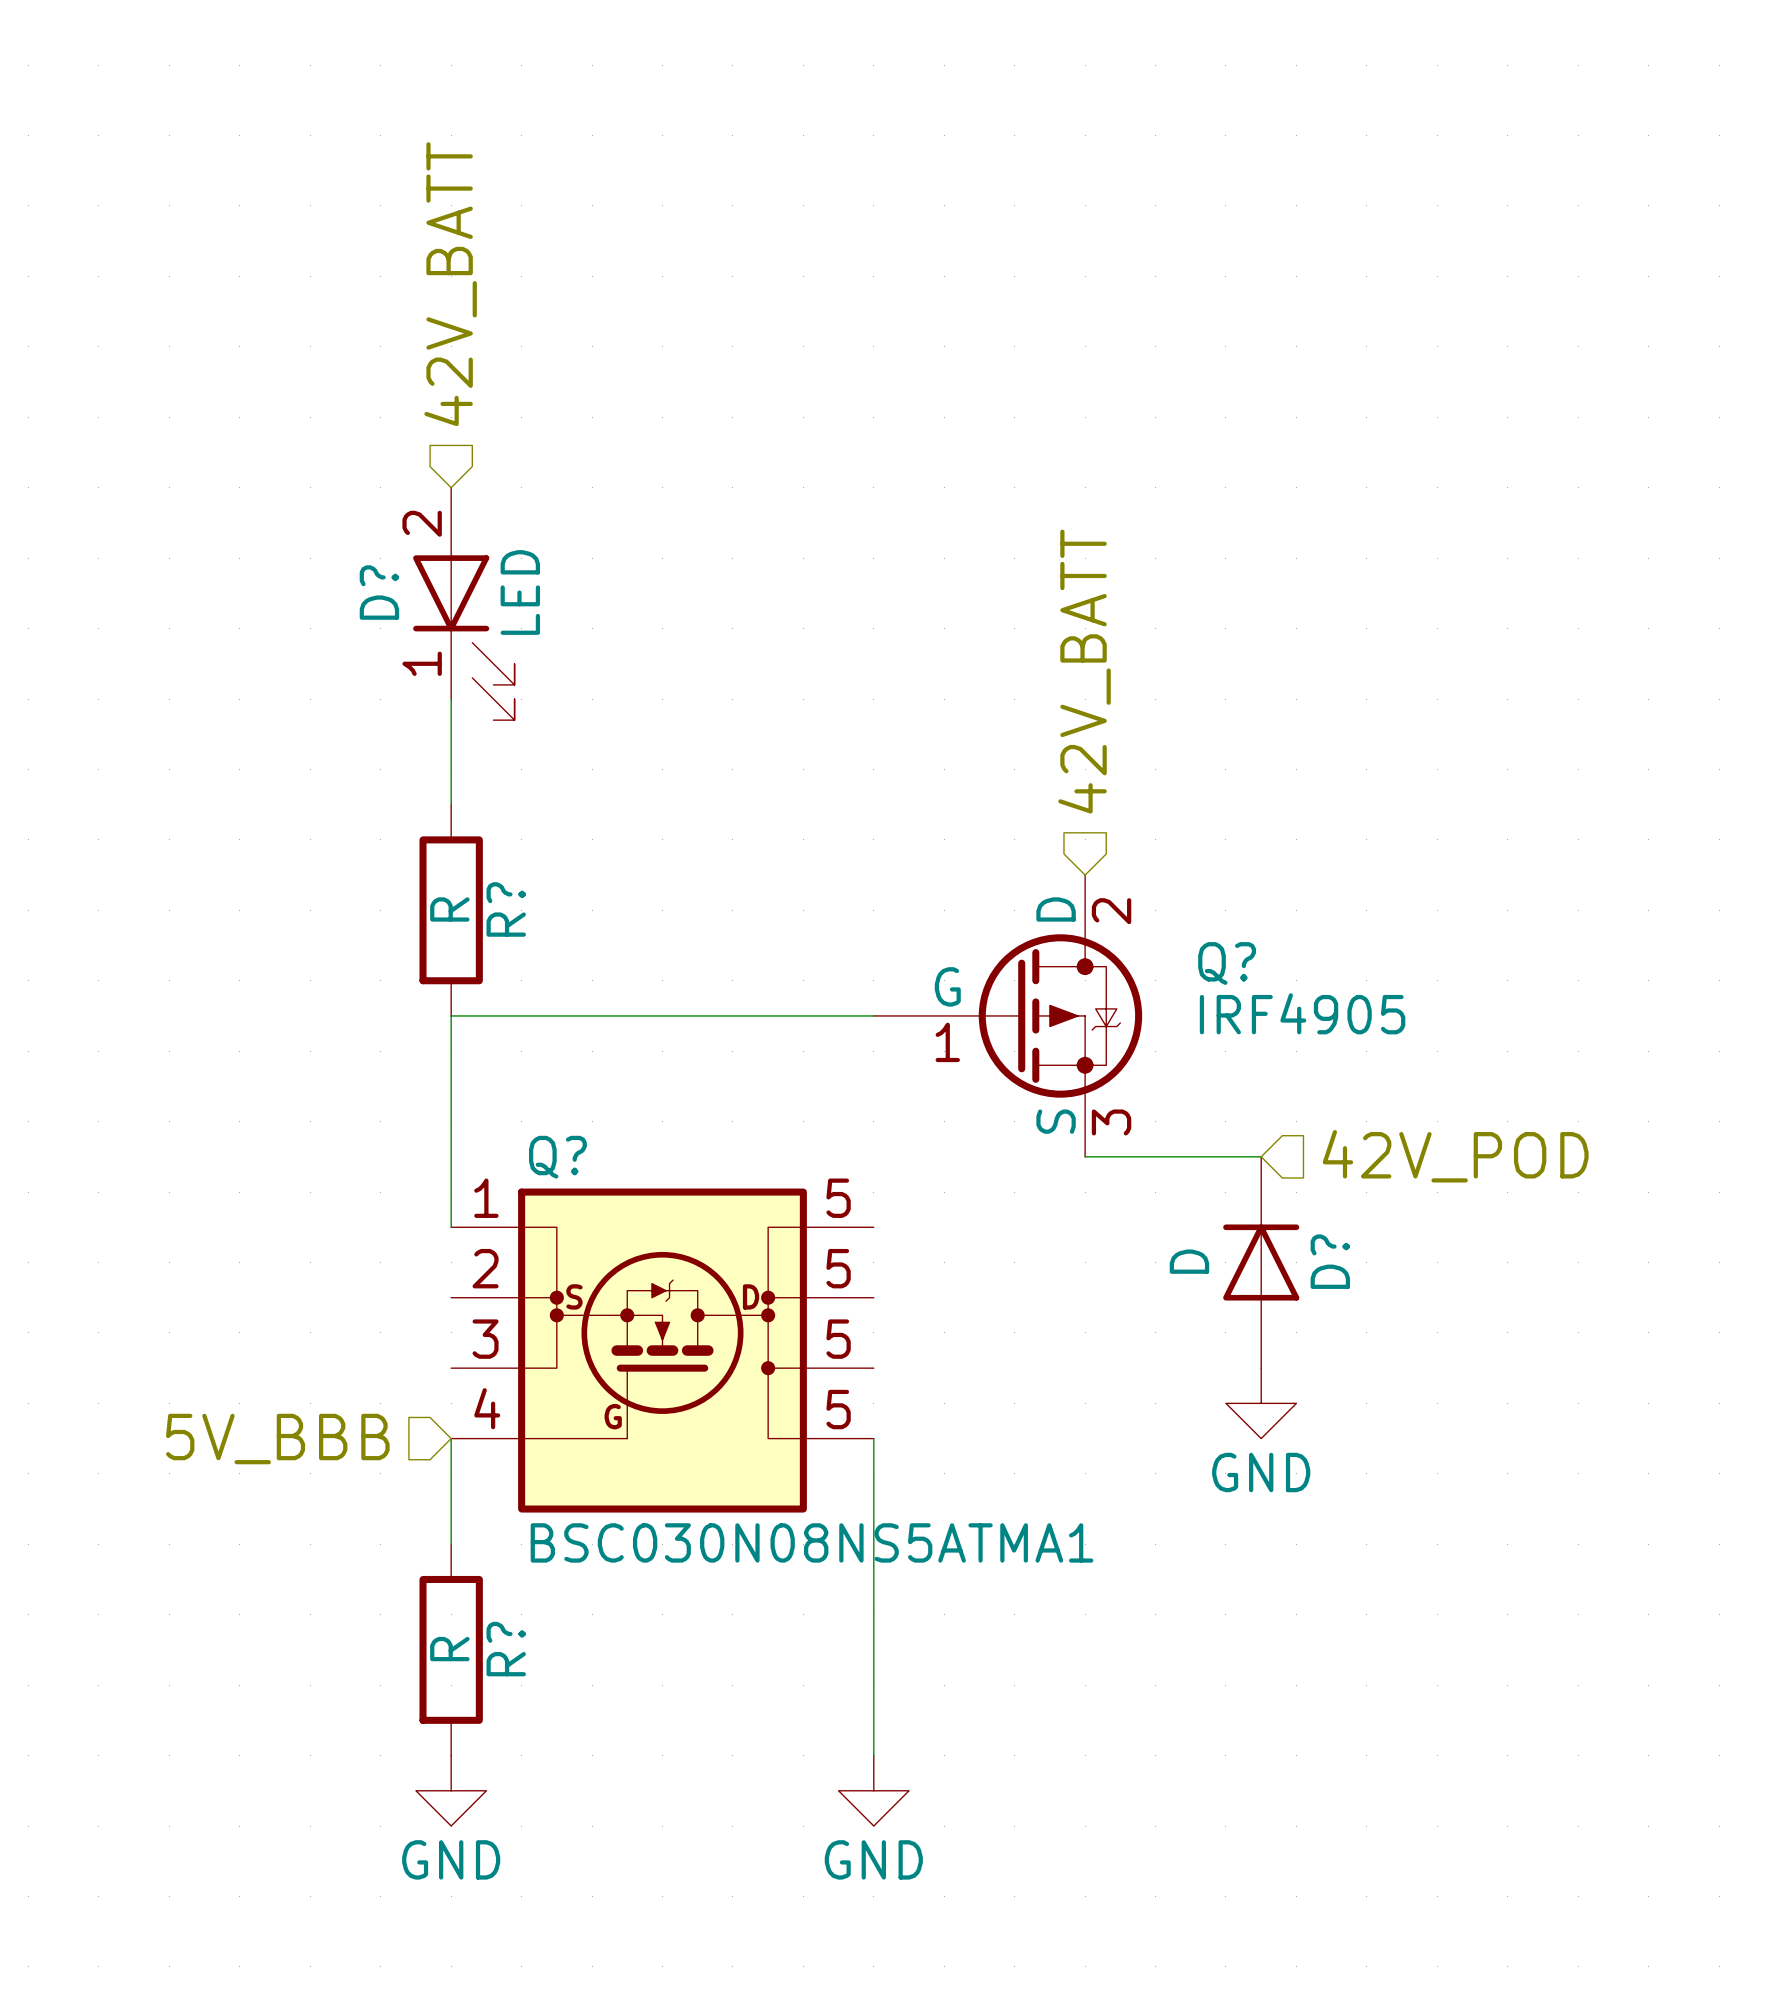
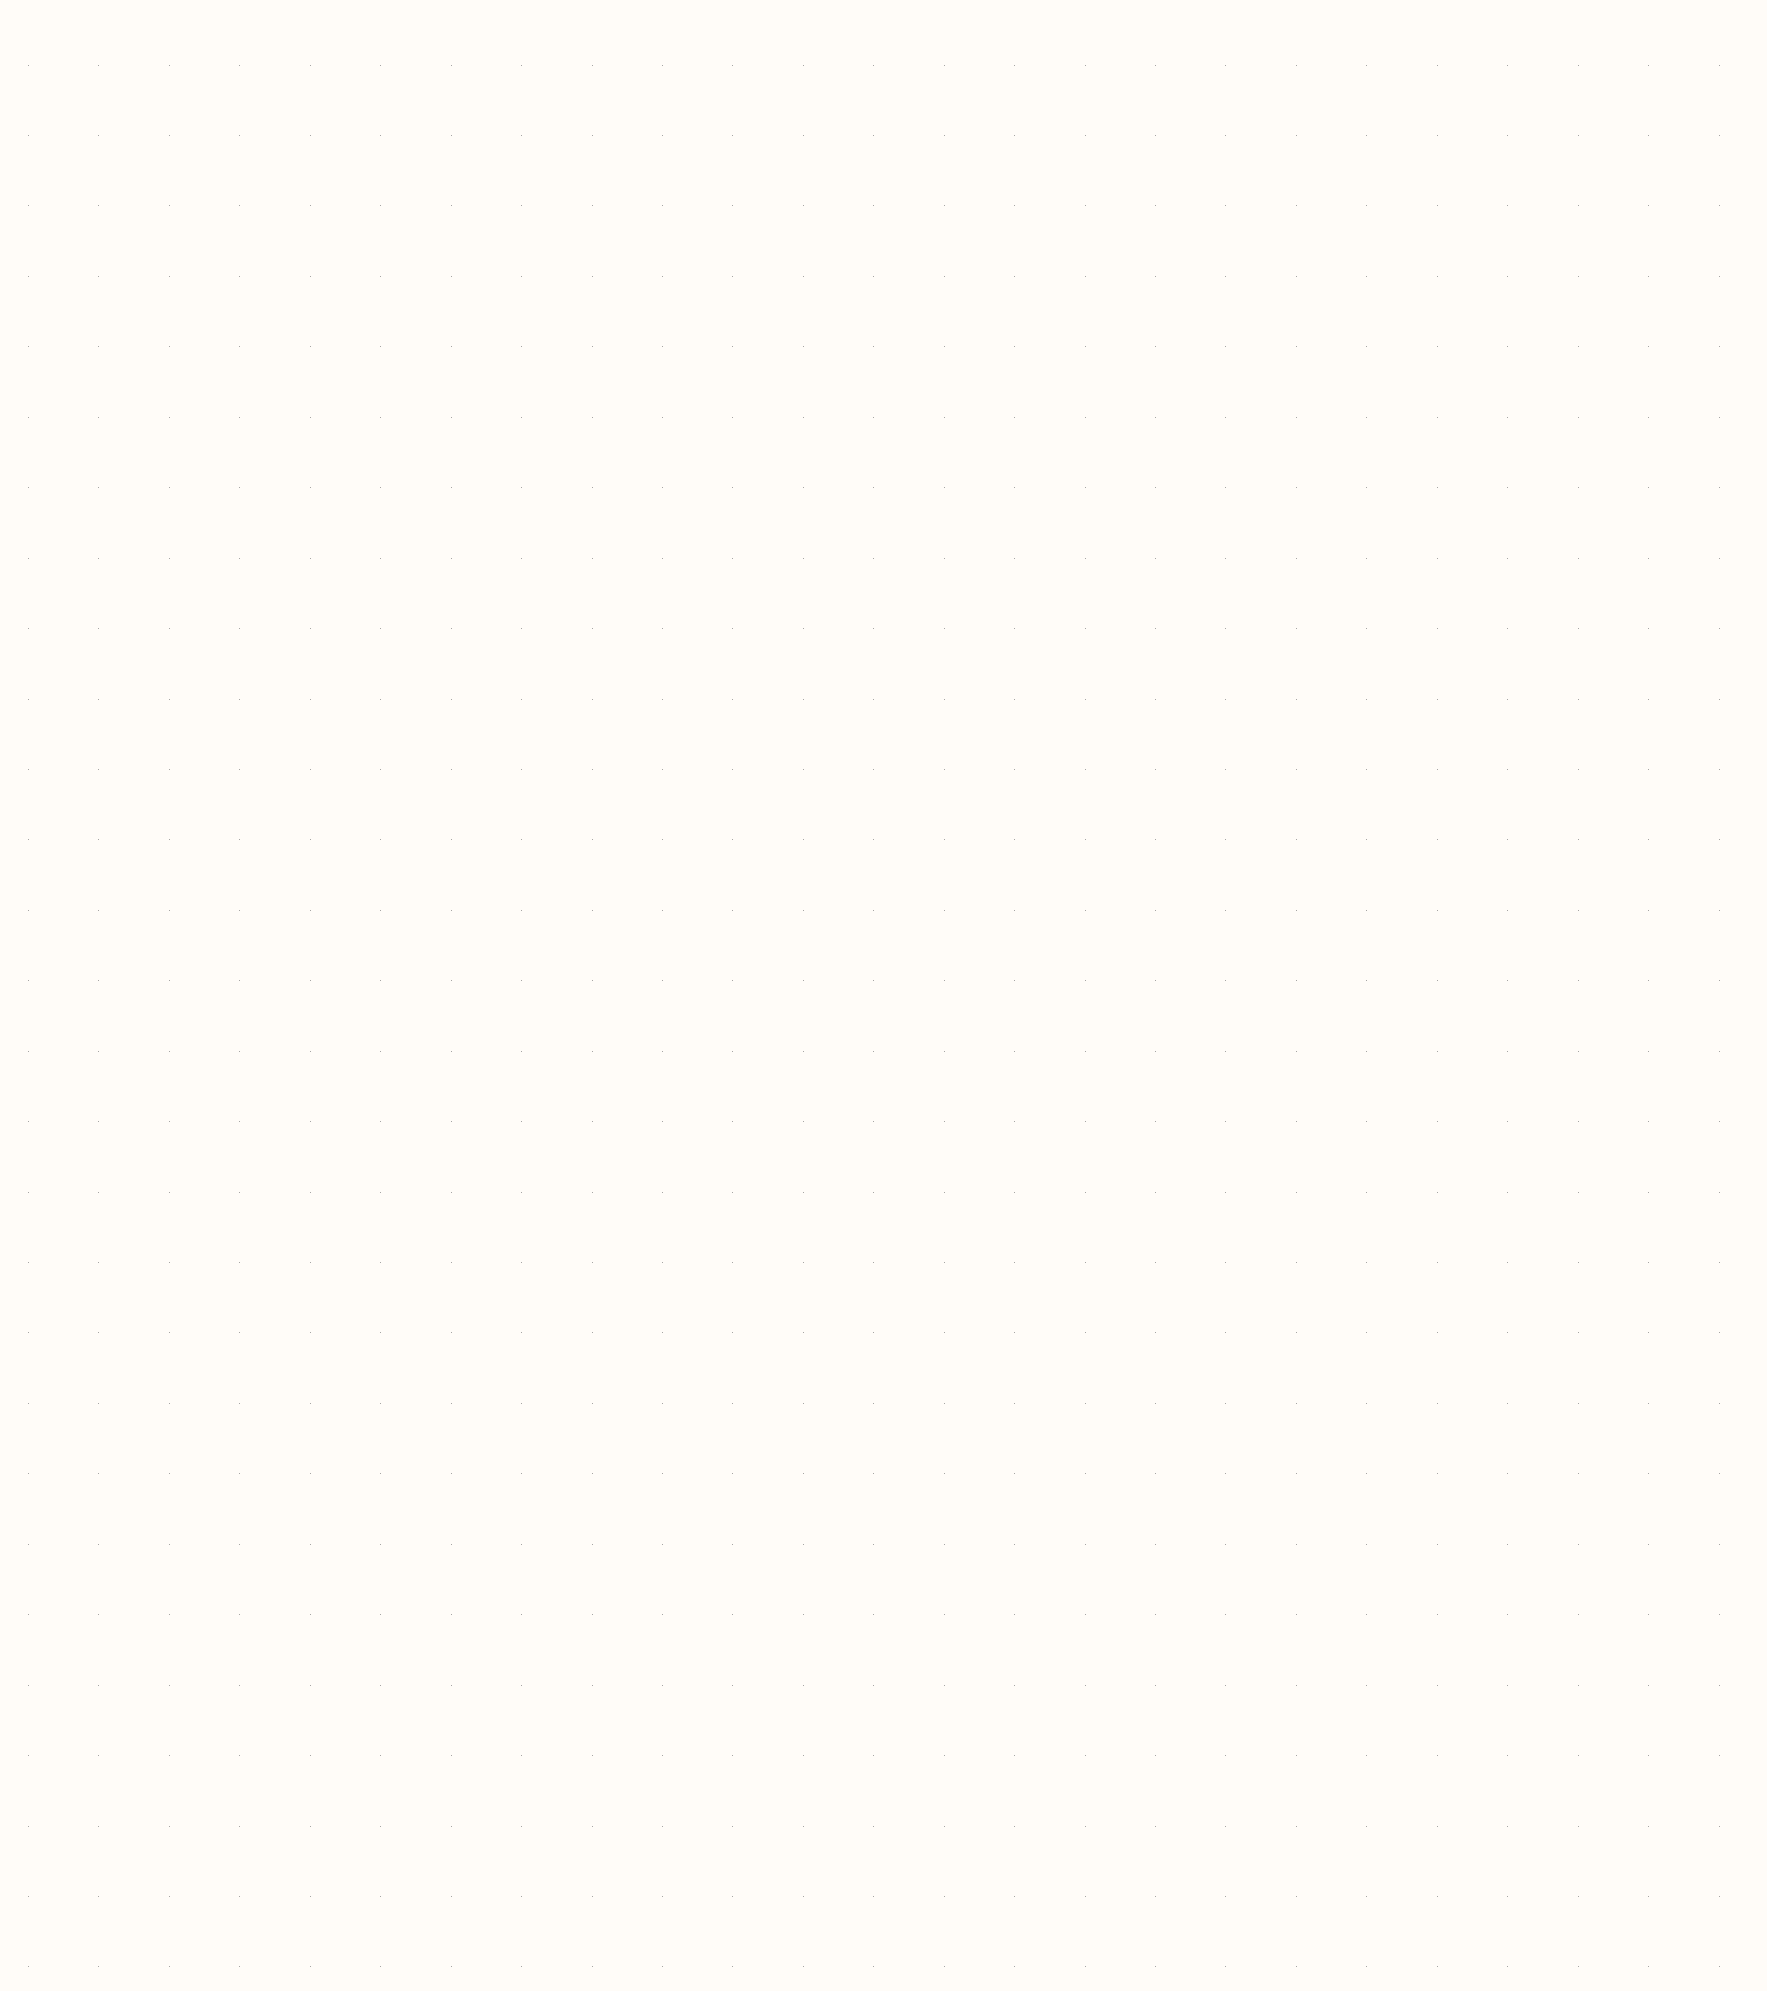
hierarchical label: 42V_BATT (450, 284) -> none
D?: LED (463, 603) -> none
hierarchical label: 42V_BATT (1084, 671) -> none
wire: (451, 699) (451, 804) -> none
R?: R (451, 910) -> none
wire: (873, 1015) (451, 1015) (451, 1227) -> none
Q?: IRF4905 (1007, 1015) -> none
wire: (1085, 1156) (1261, 1156) -> none
hierarchical label: 42V_POD (1455, 1156) -> none
D?: D (1261, 1262) -> none
Q?: BSC030N08NS5ATMA1 (662, 1350) -> none
power symbol: GND (1261, 1403) -> none
wire: (451, 1438) (451, 1544) -> none
wire: (873, 1438) (873, 1755) -> none
hierarchical label: 5V_BBB (277, 1439) -> none
R?: R (451, 1649) -> none
power symbol: GND (451, 1790) -> none
power symbol: GND (873, 1790) -> none

